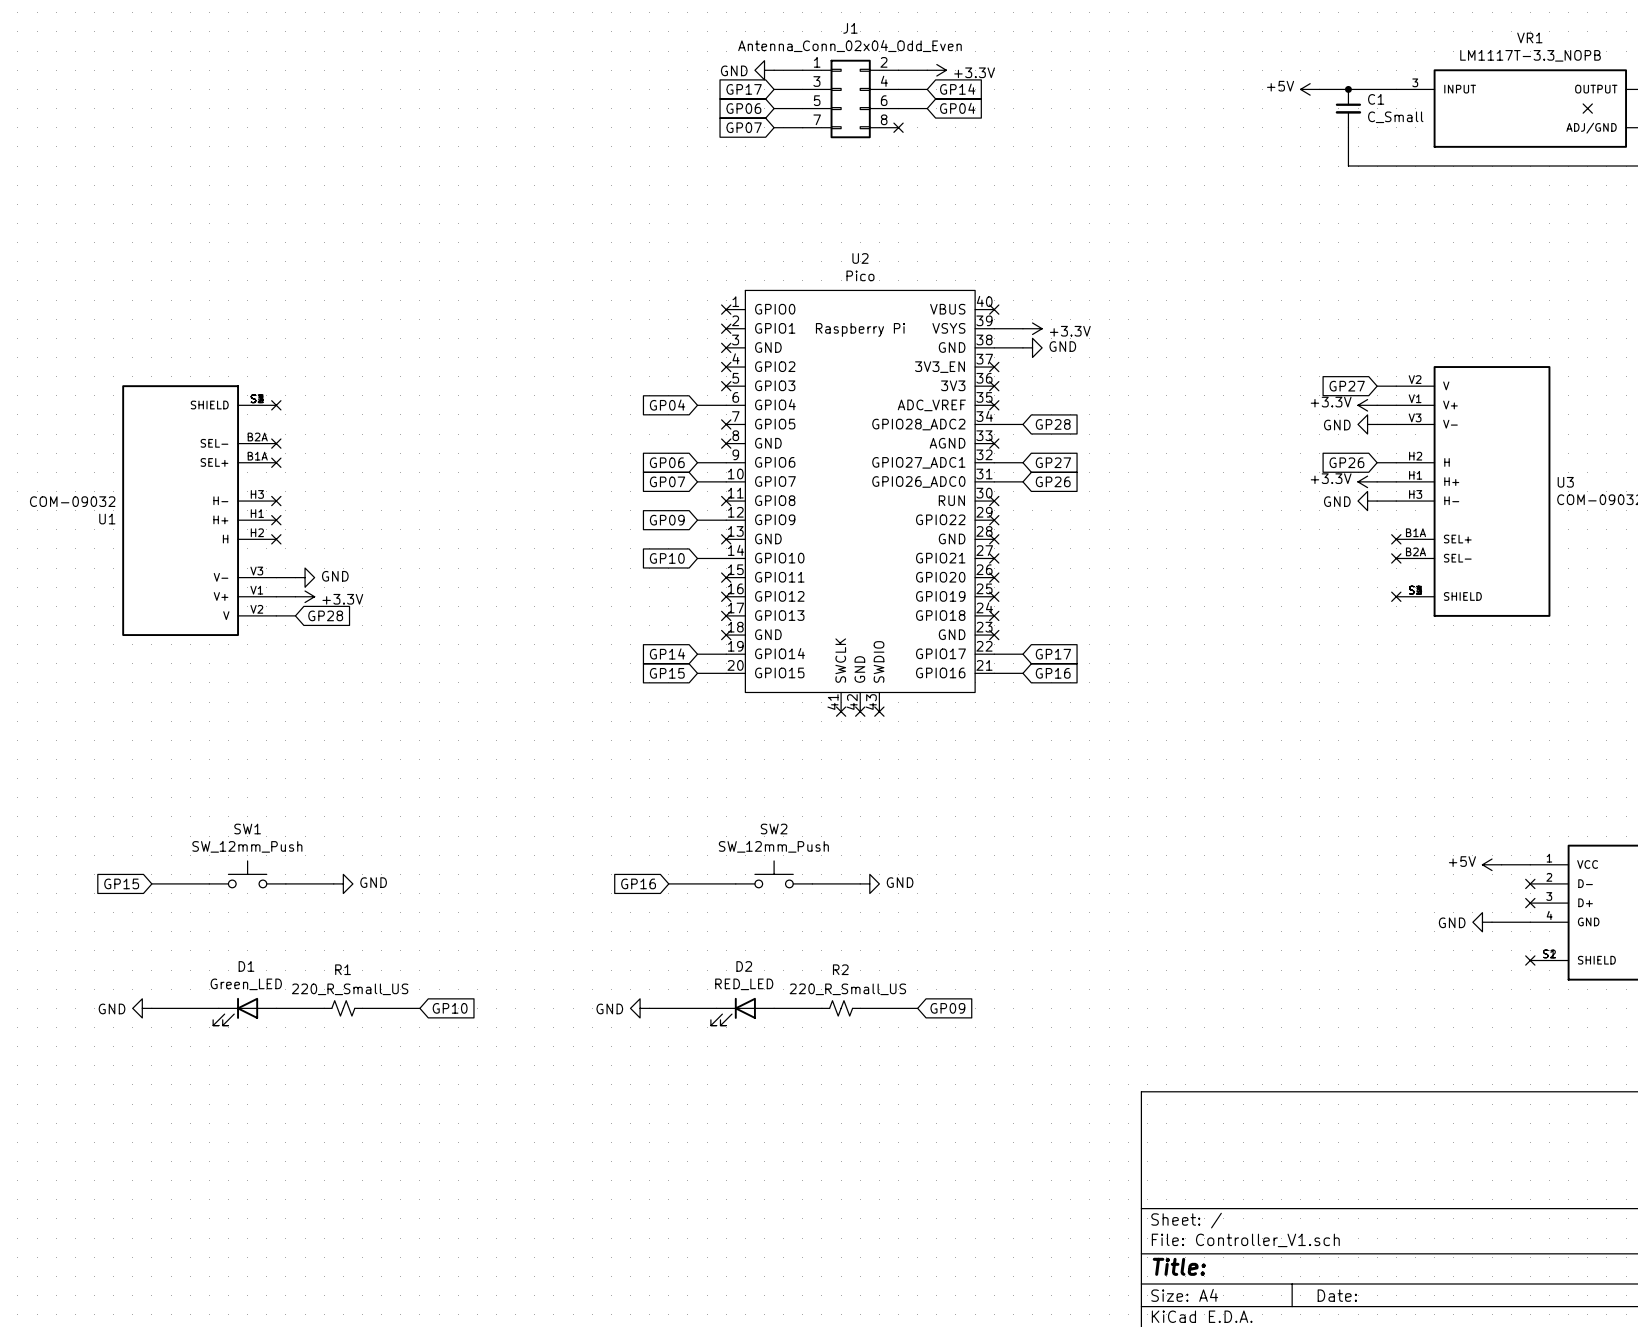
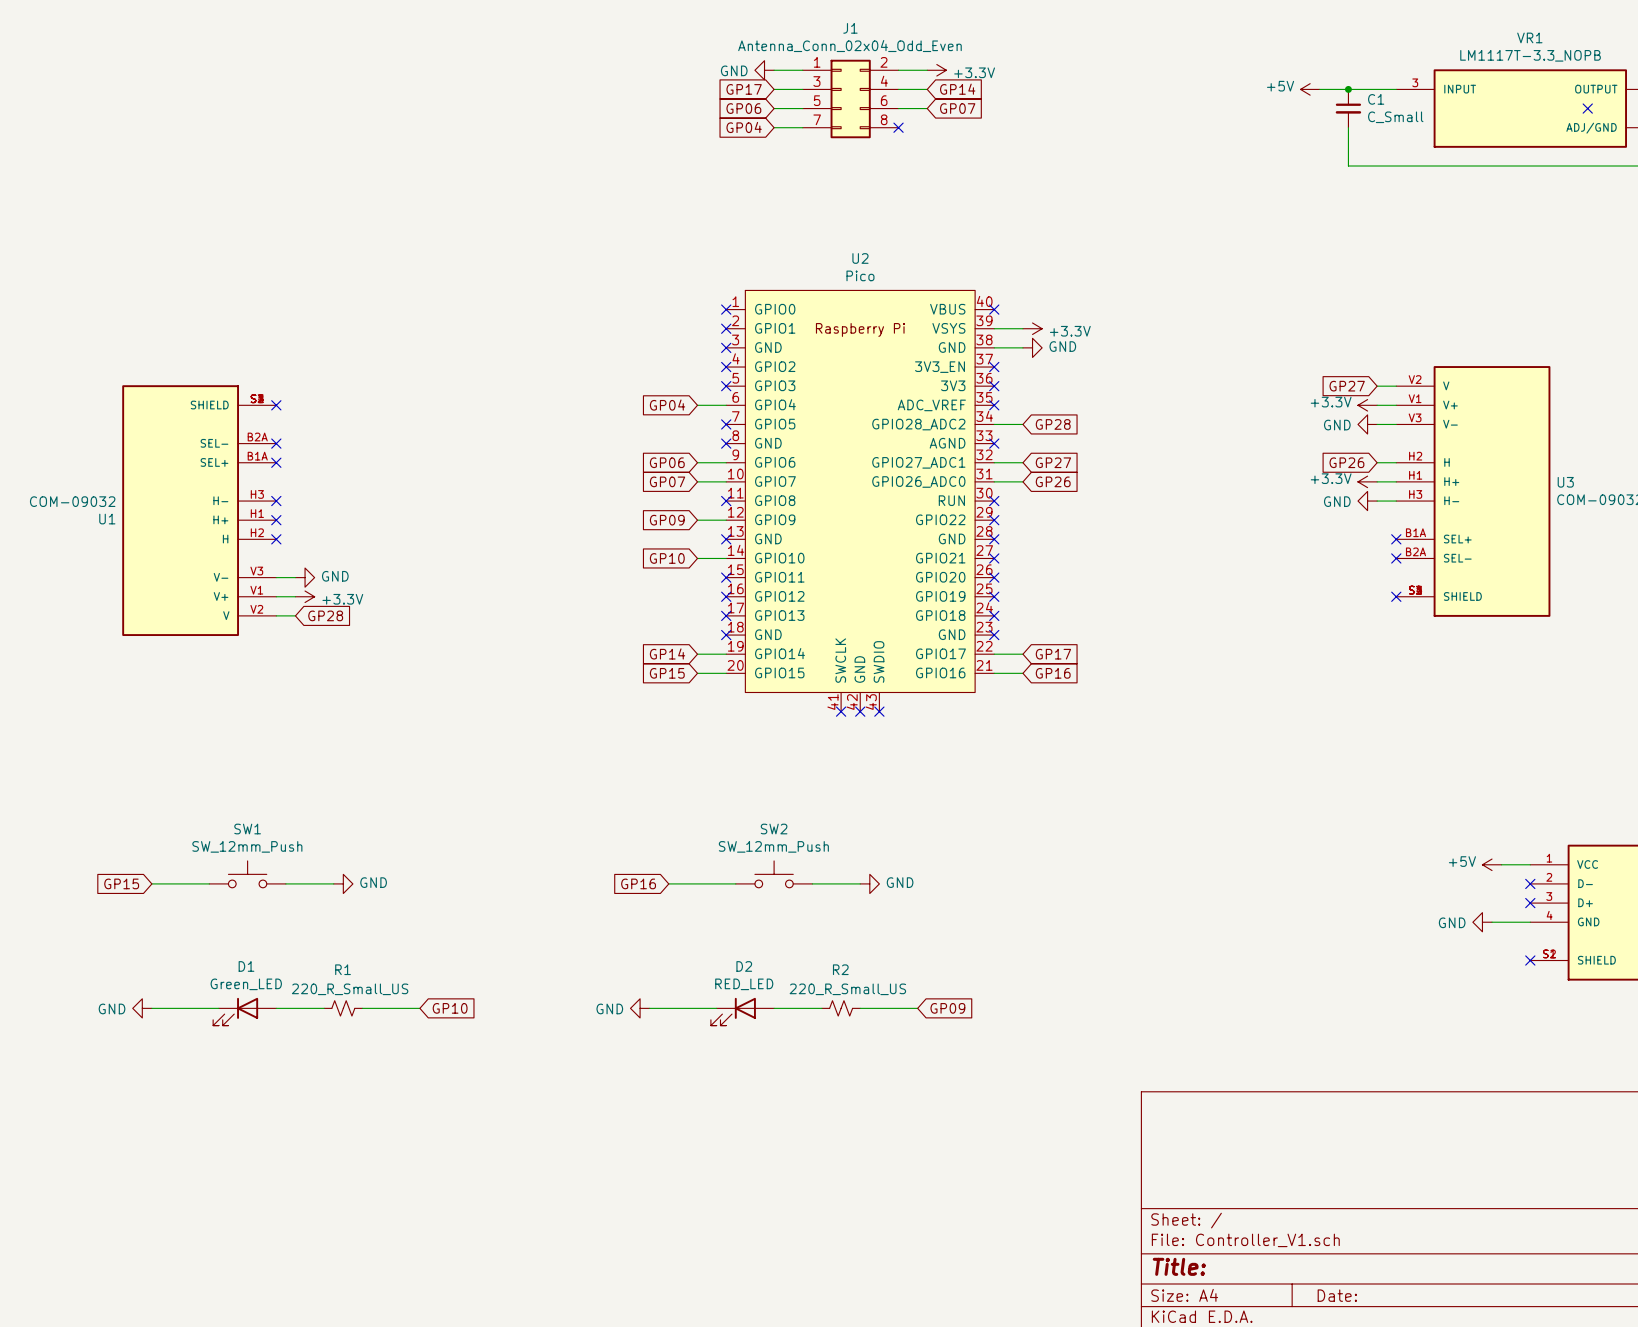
global label: GP04 (957, 108) -> GP07 (957, 108)
global label: GP07 (744, 127) -> GP04 (744, 127)

